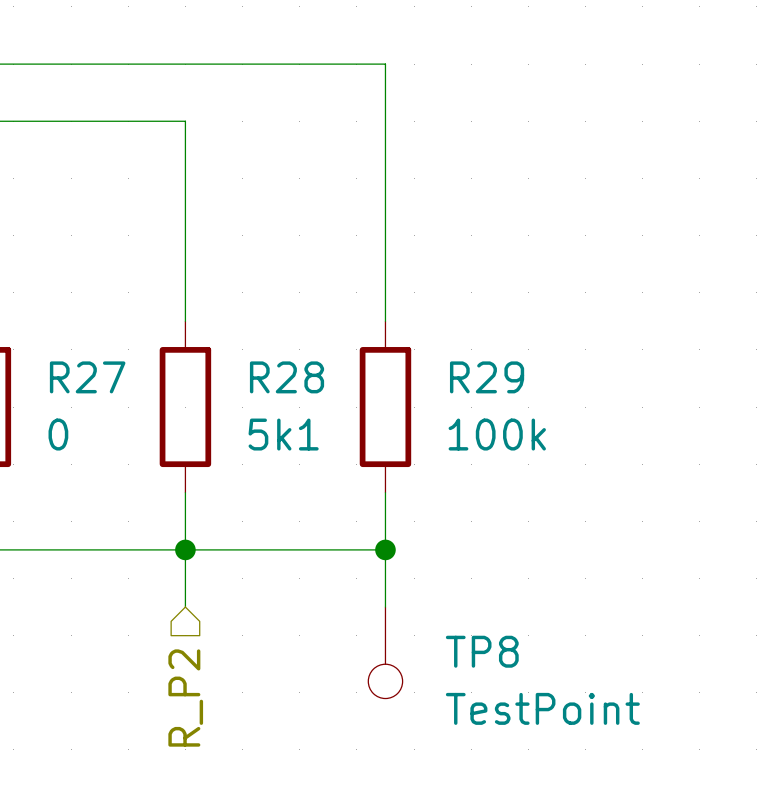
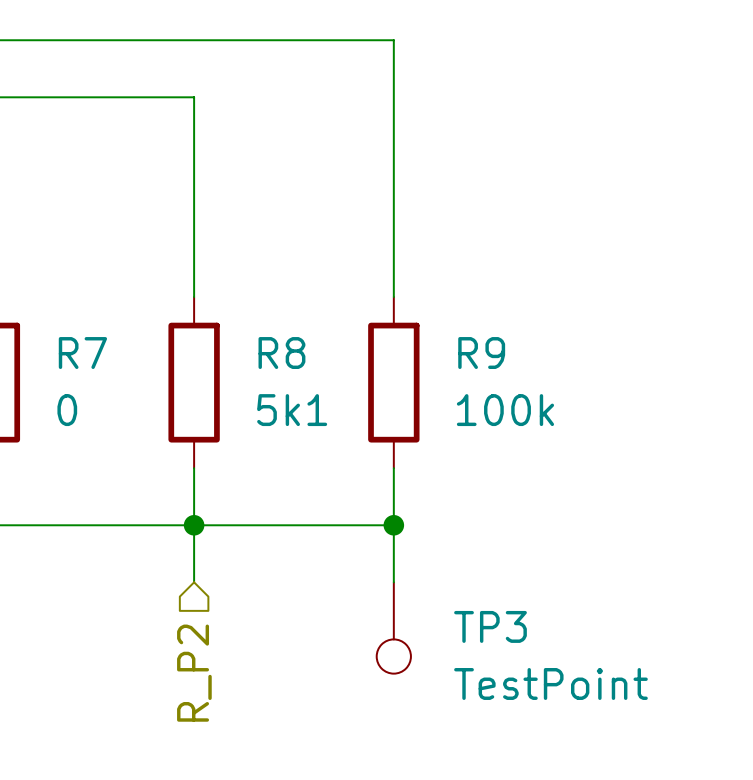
R27 name: R27 (87, 377) -> R7 (82, 353)
R28 name: R28 (287, 377) -> R8 (281, 353)
R29 name: R29 (487, 377) -> R9 (481, 353)
TP8 name: TP8 (482, 651) -> TP3 (490, 626)

